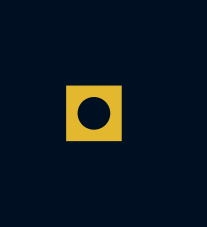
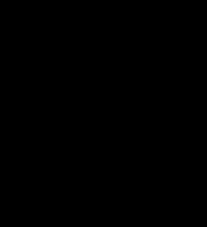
part: (93, 113) -> none

